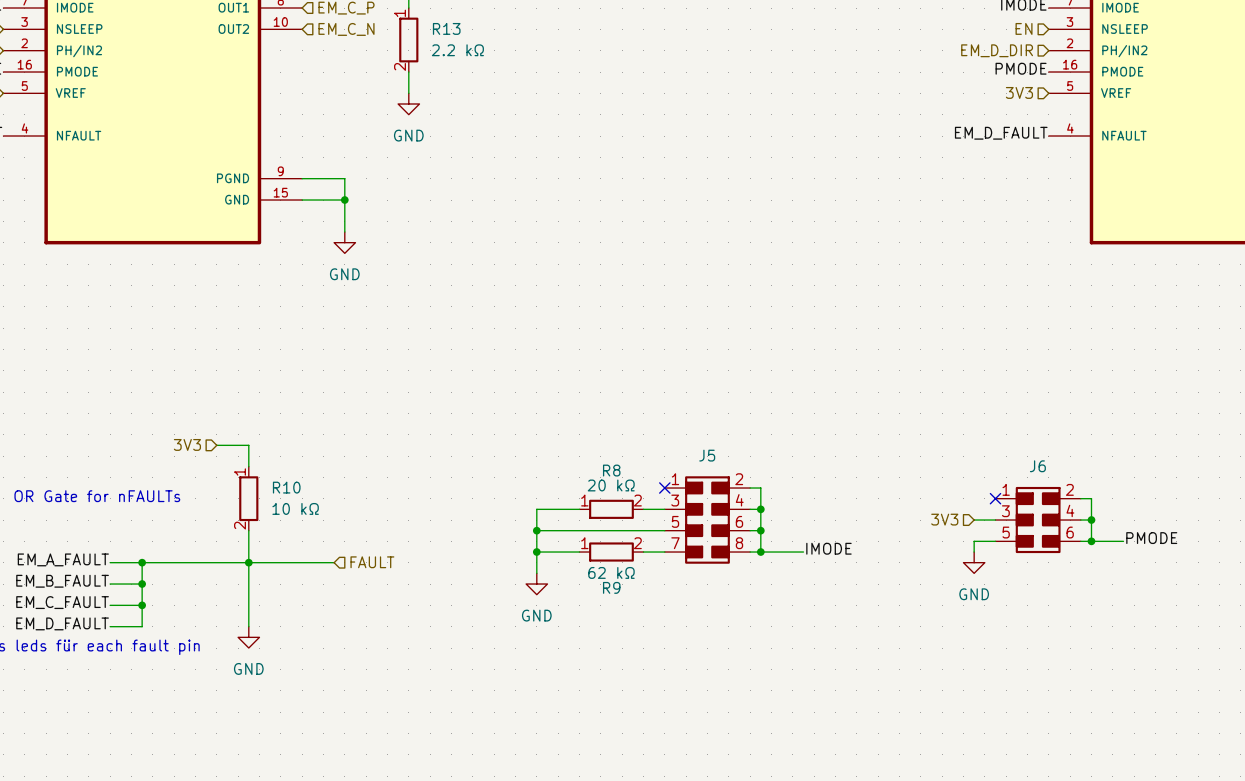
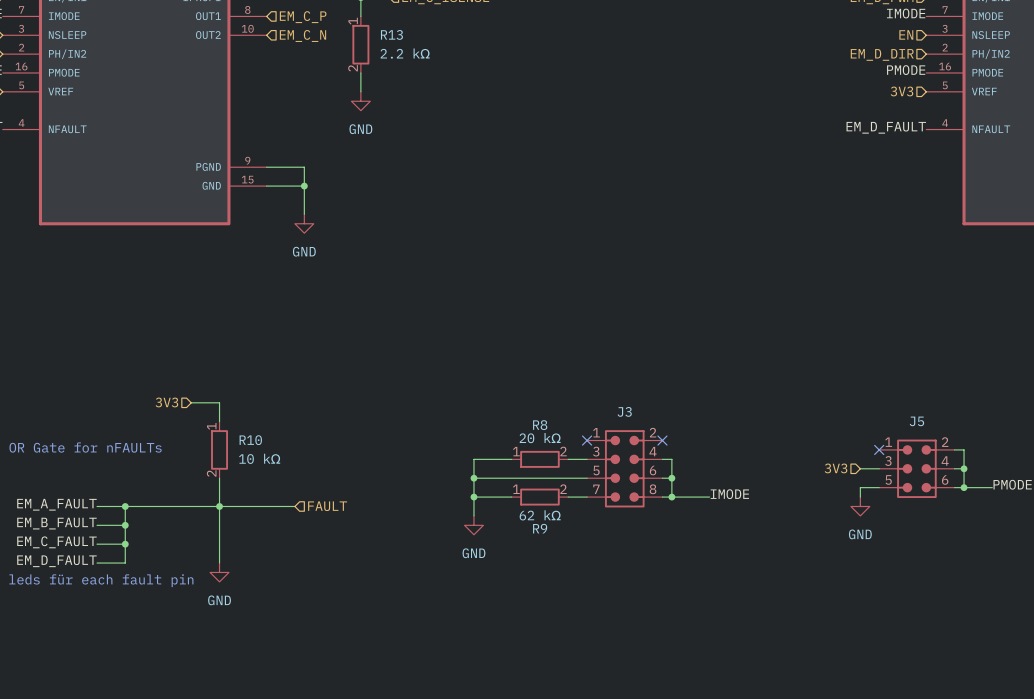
J5 symbol: [664, 476, 751, 564] -> [879, 439, 955, 499]
wire: (750, 488) (760, 488) (760, 509) -> none
no-connect mark: none -> (662, 440)
junction: (760, 509) -> none
J3: none -> (624, 468)
J6: (1038, 520) -> none

